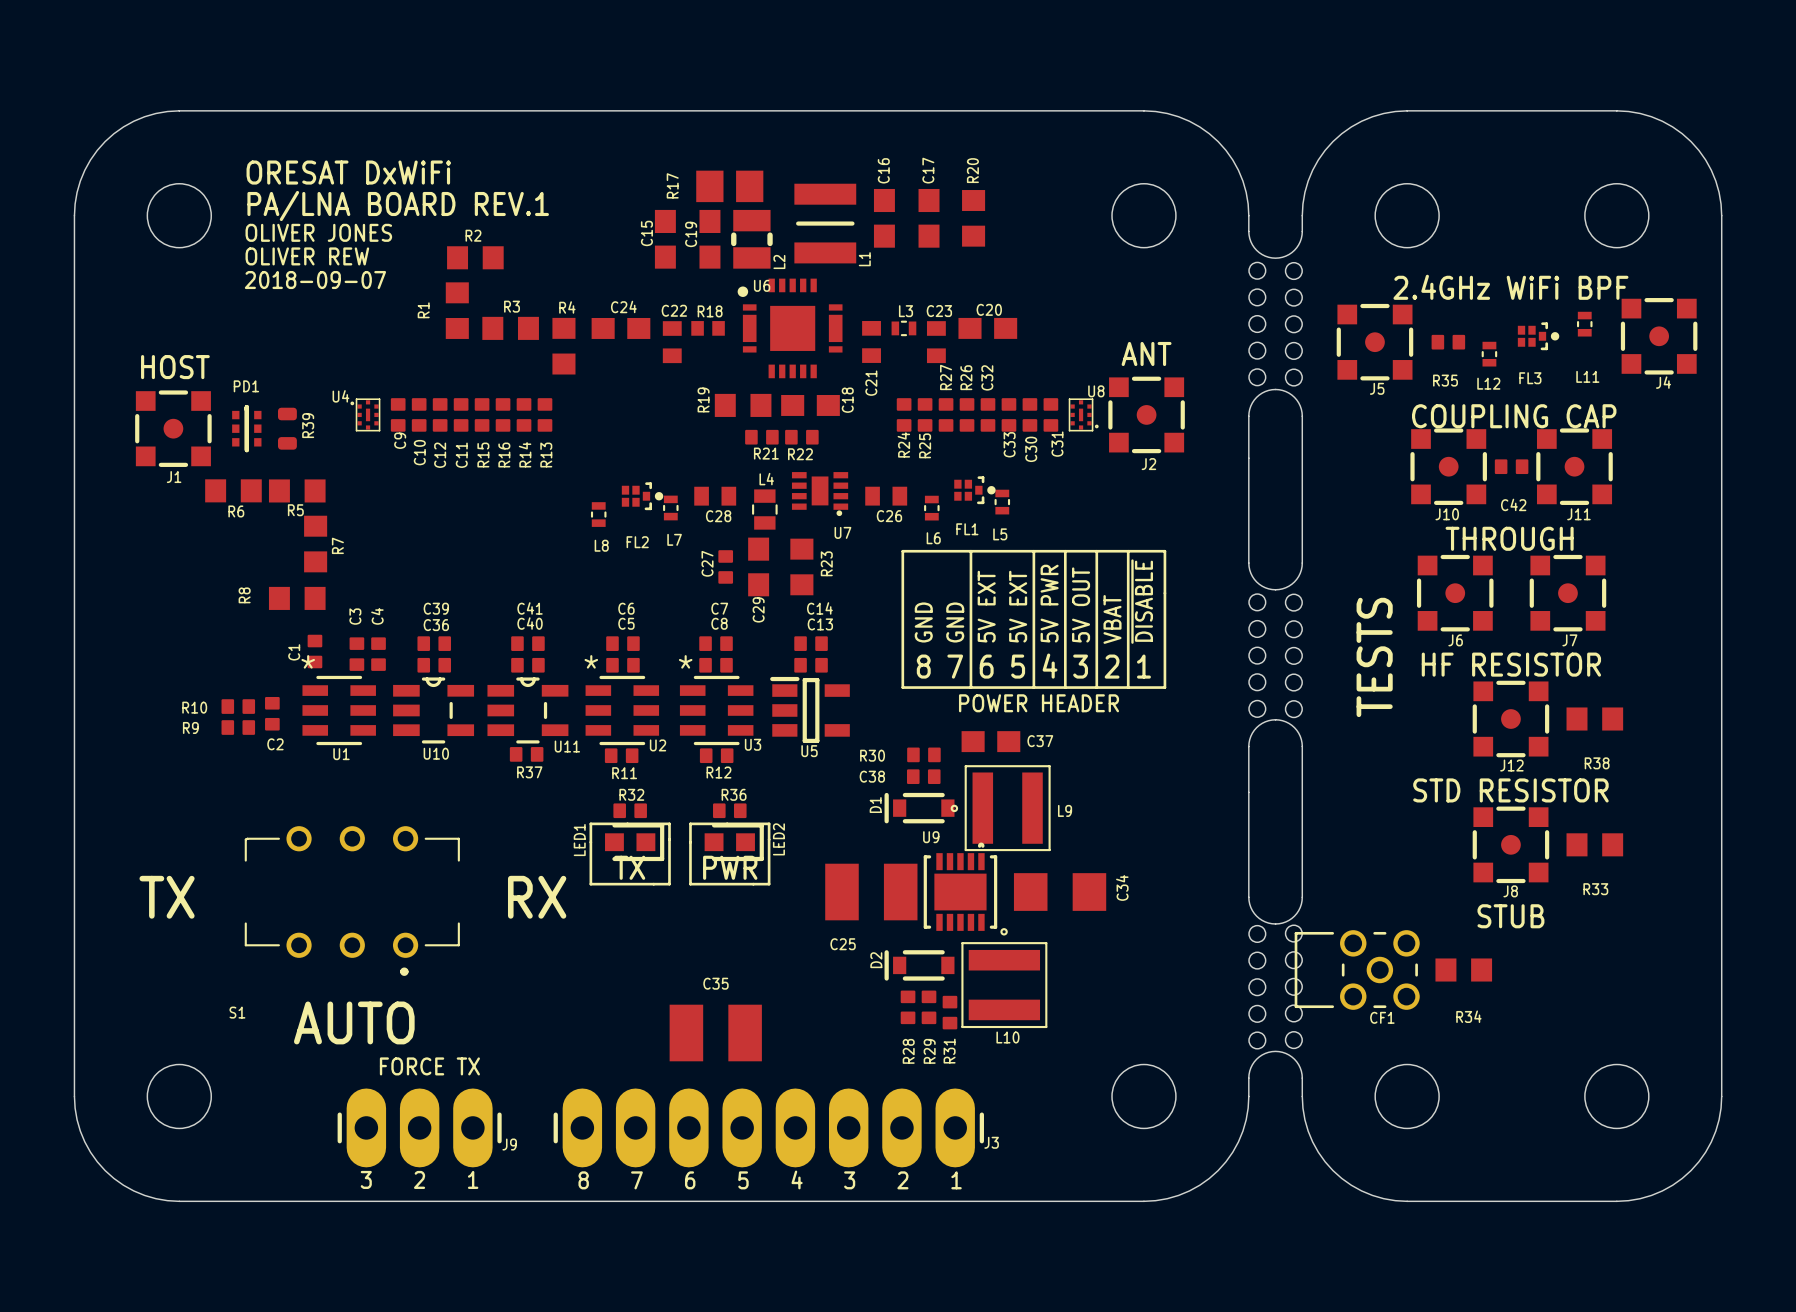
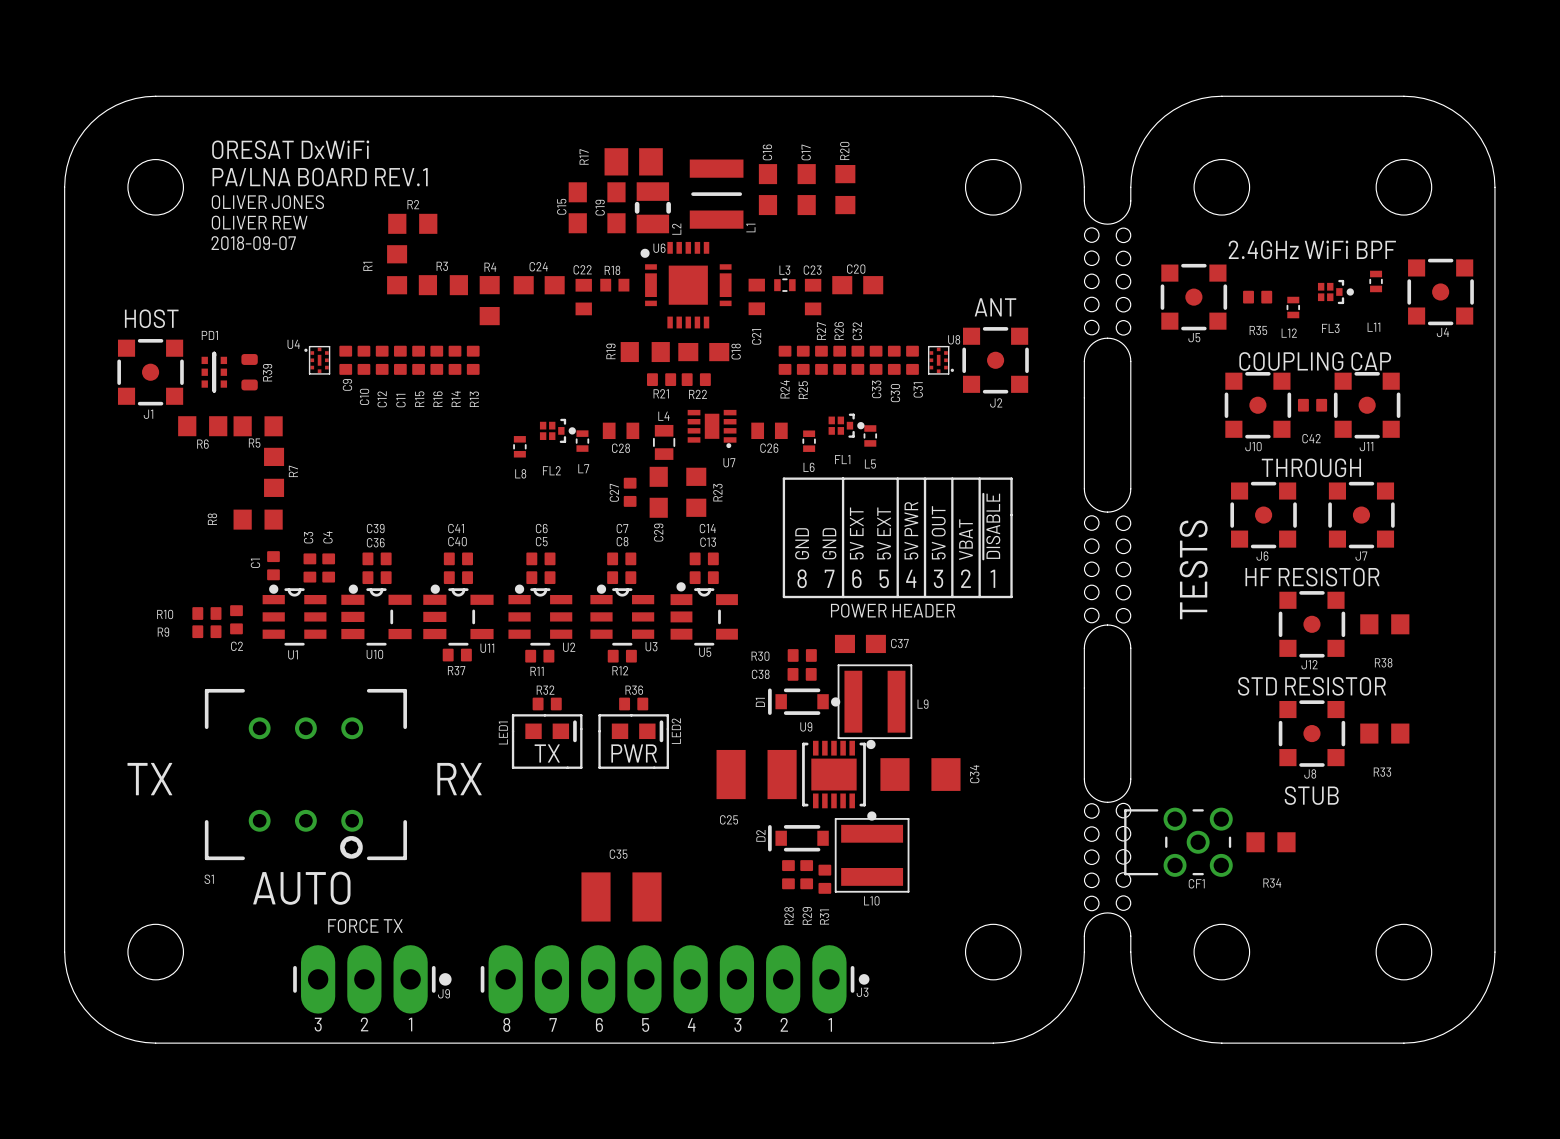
U1 footprint: [302, 675, 376, 746] -> [262, 584, 327, 646]
U2 footprint: [585, 675, 660, 746] -> [508, 584, 573, 646]
U3 footprint: [679, 675, 754, 746] -> [590, 584, 655, 646]
U5 footprint: [770, 676, 850, 743] -> [670, 582, 738, 646]
U10 footprint: [393, 677, 475, 744] -> [341, 584, 412, 646]
U11 footprint: [487, 677, 569, 744] -> [423, 584, 494, 646]
L9 footprint: [950, 765, 1051, 852] -> [831, 664, 913, 740]
LED1 footprint: [605, 823, 665, 862] -> [525, 720, 577, 743]
LED2 footprint: [704, 823, 764, 862] -> [611, 720, 664, 743]
S1 footprint: [244, 826, 460, 976] -> [204, 688, 407, 861]
U9 footprint: [923, 842, 998, 931] -> [802, 739, 876, 809]
L10 footprint: [961, 928, 1048, 1029] -> [834, 811, 910, 893]
J9 footprint: [337, 1088, 502, 1168] -> [293, 945, 452, 1014]
J3 footprint: [553, 1088, 984, 1168] -> [480, 945, 870, 1014]

